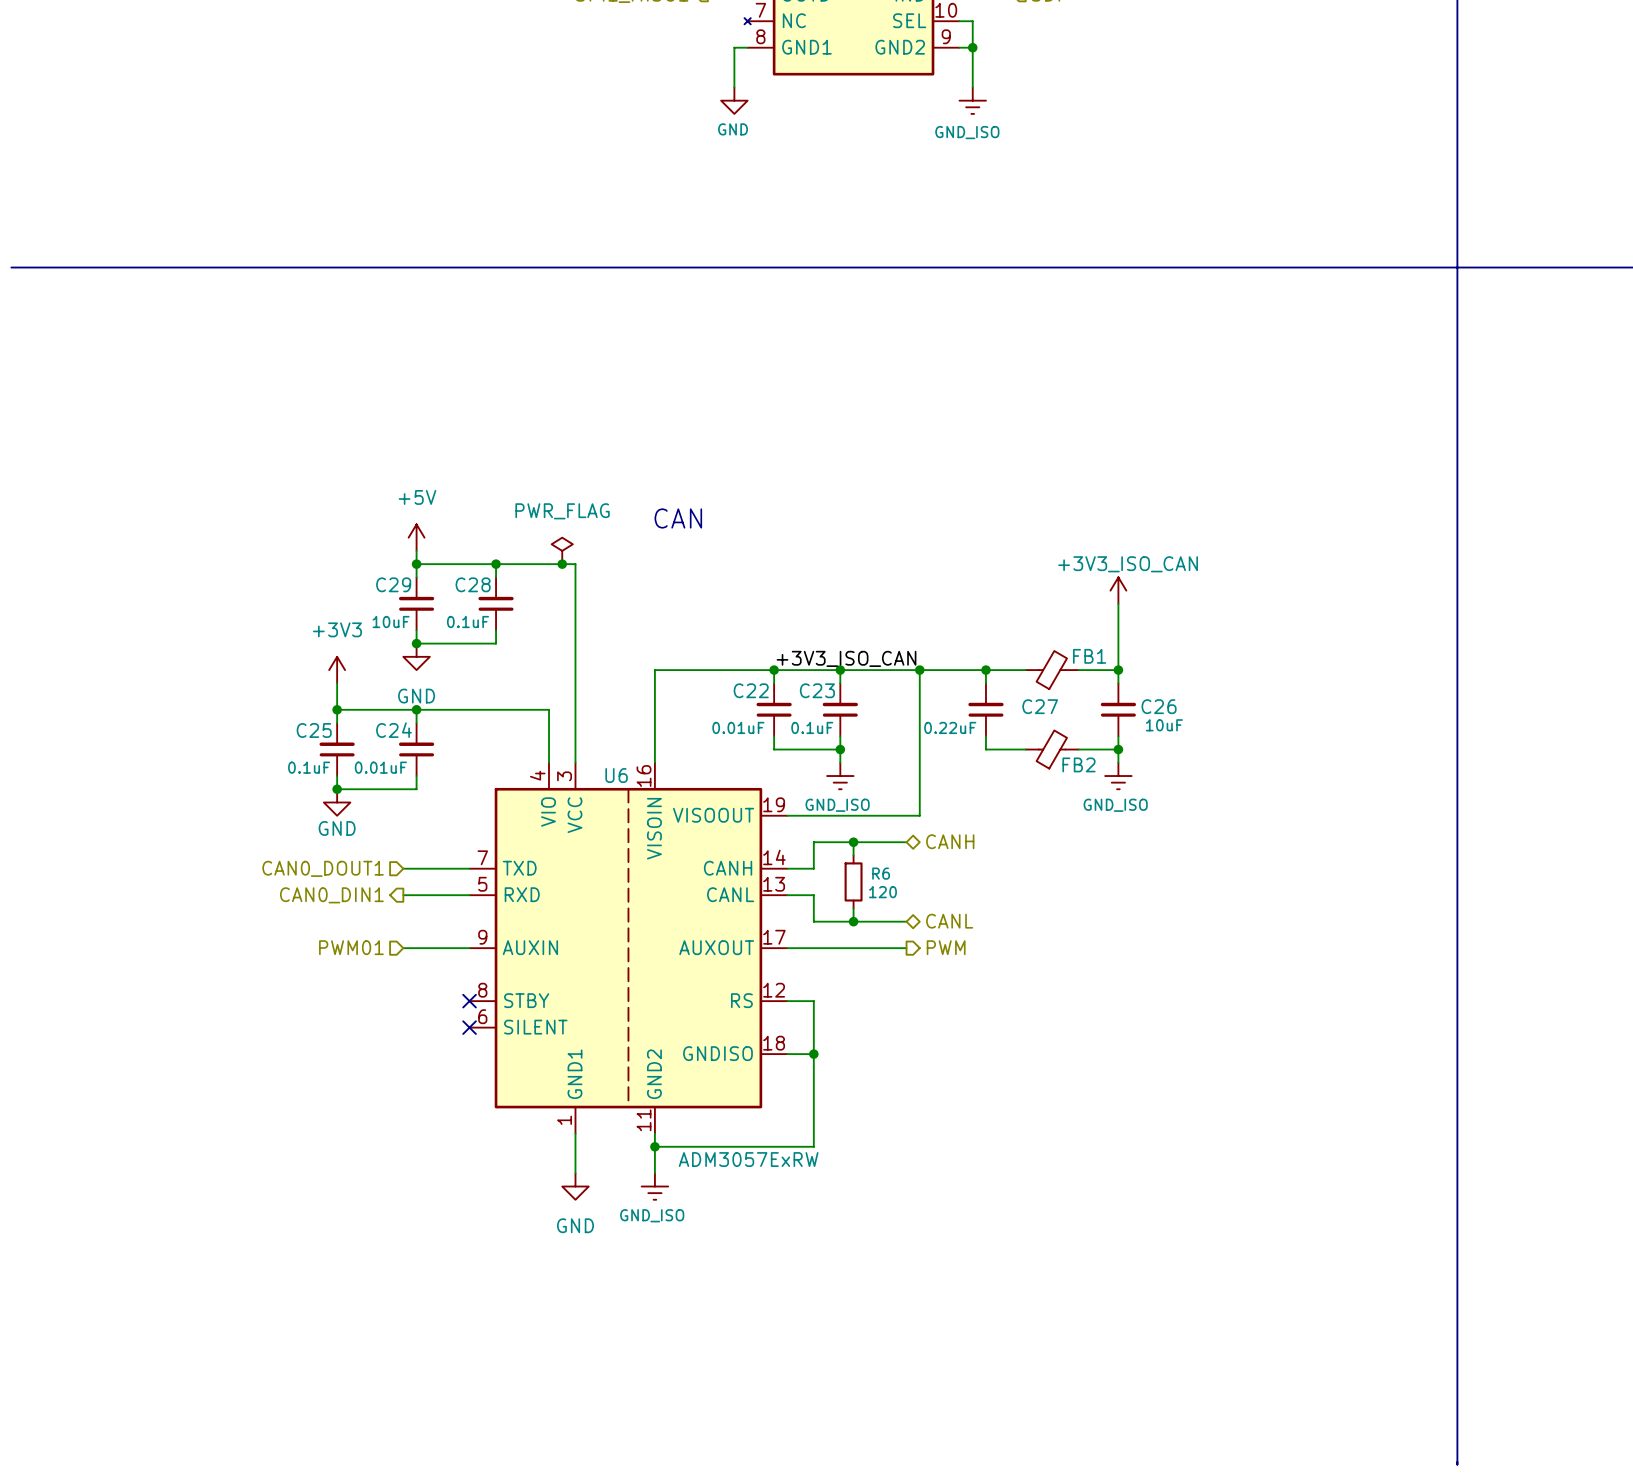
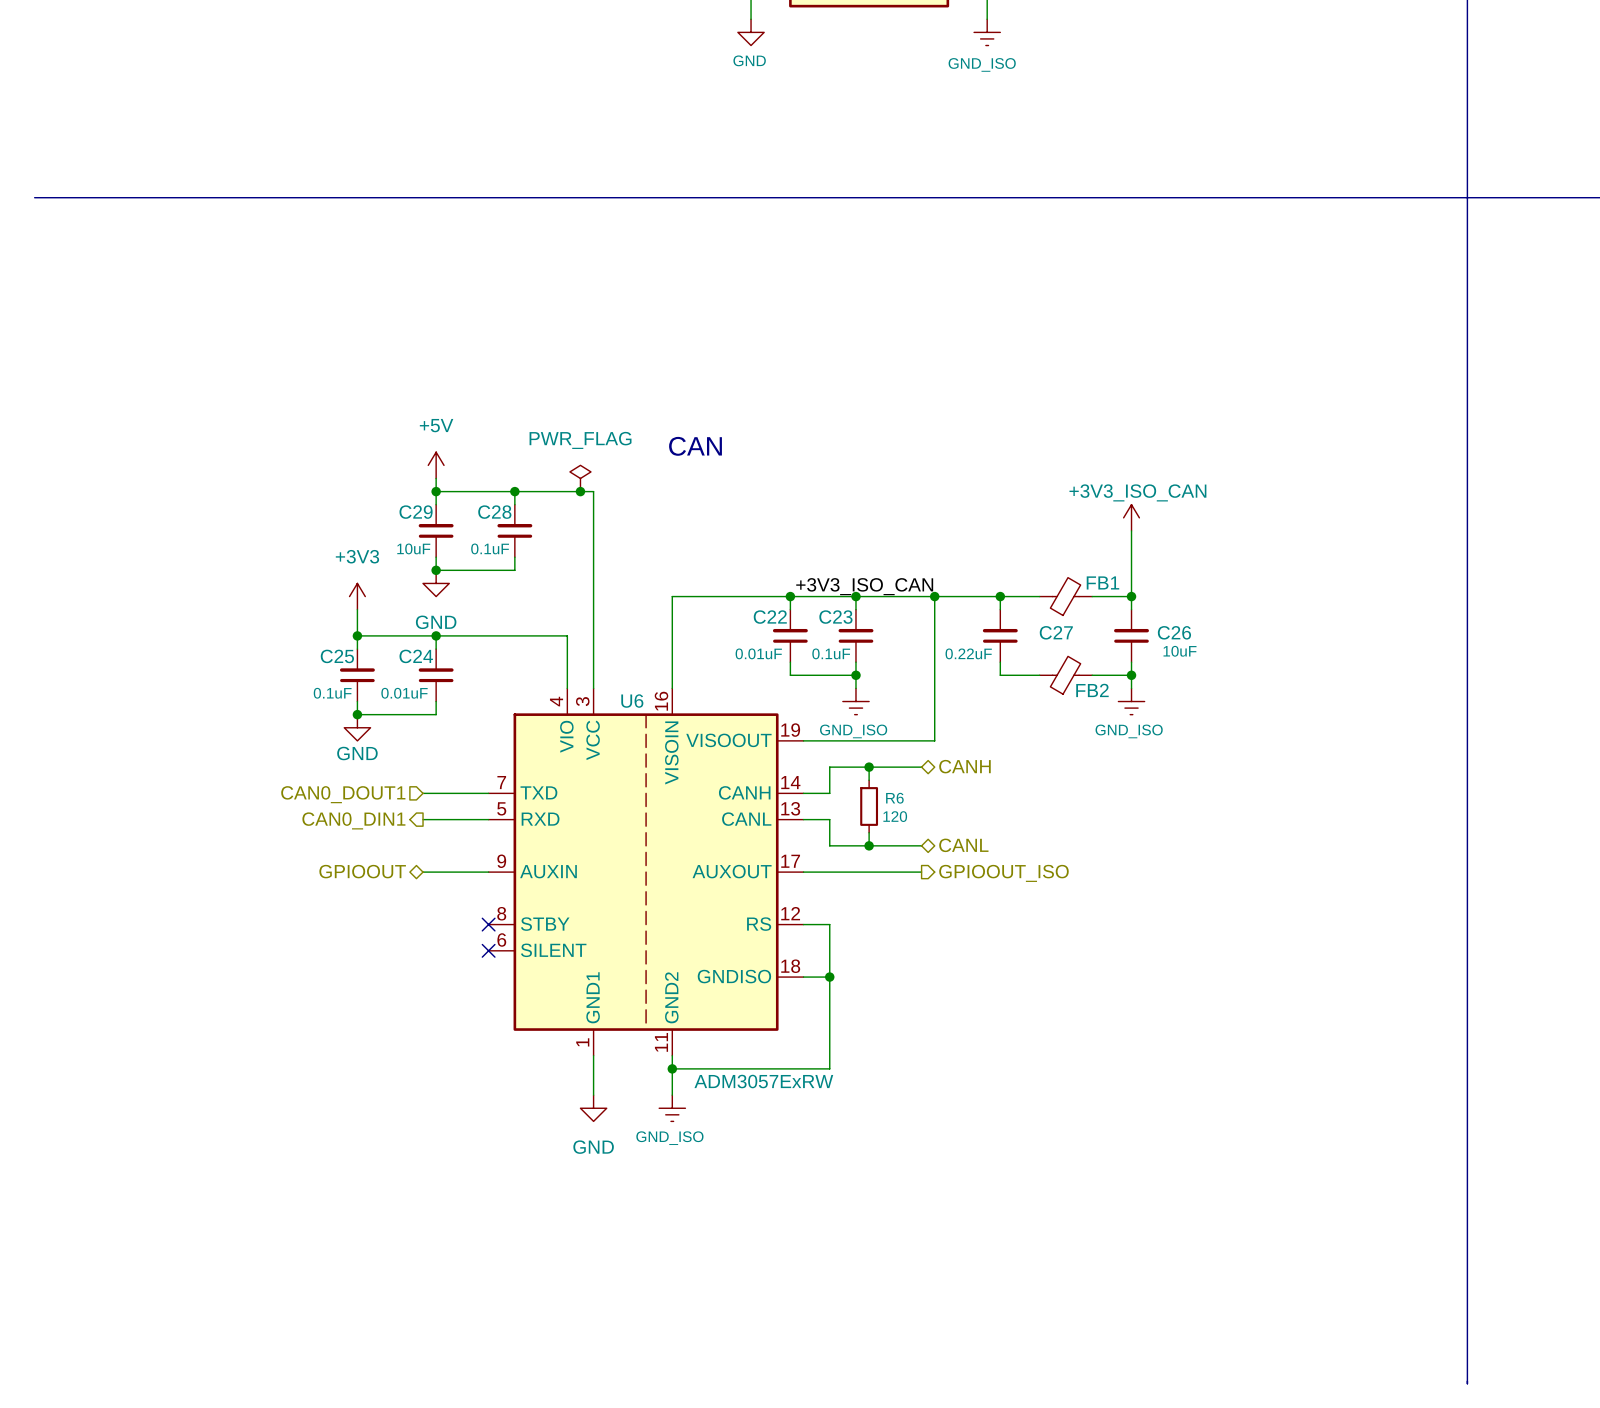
hierarchical label shape: input (351, 947) -> bidirectional (362, 871)
hierarchical label: PWM01 (351, 947) -> GPIOOUT (362, 871)
hierarchical label: PWM (946, 947) -> GPIOOUT_ISO (1003, 873)

